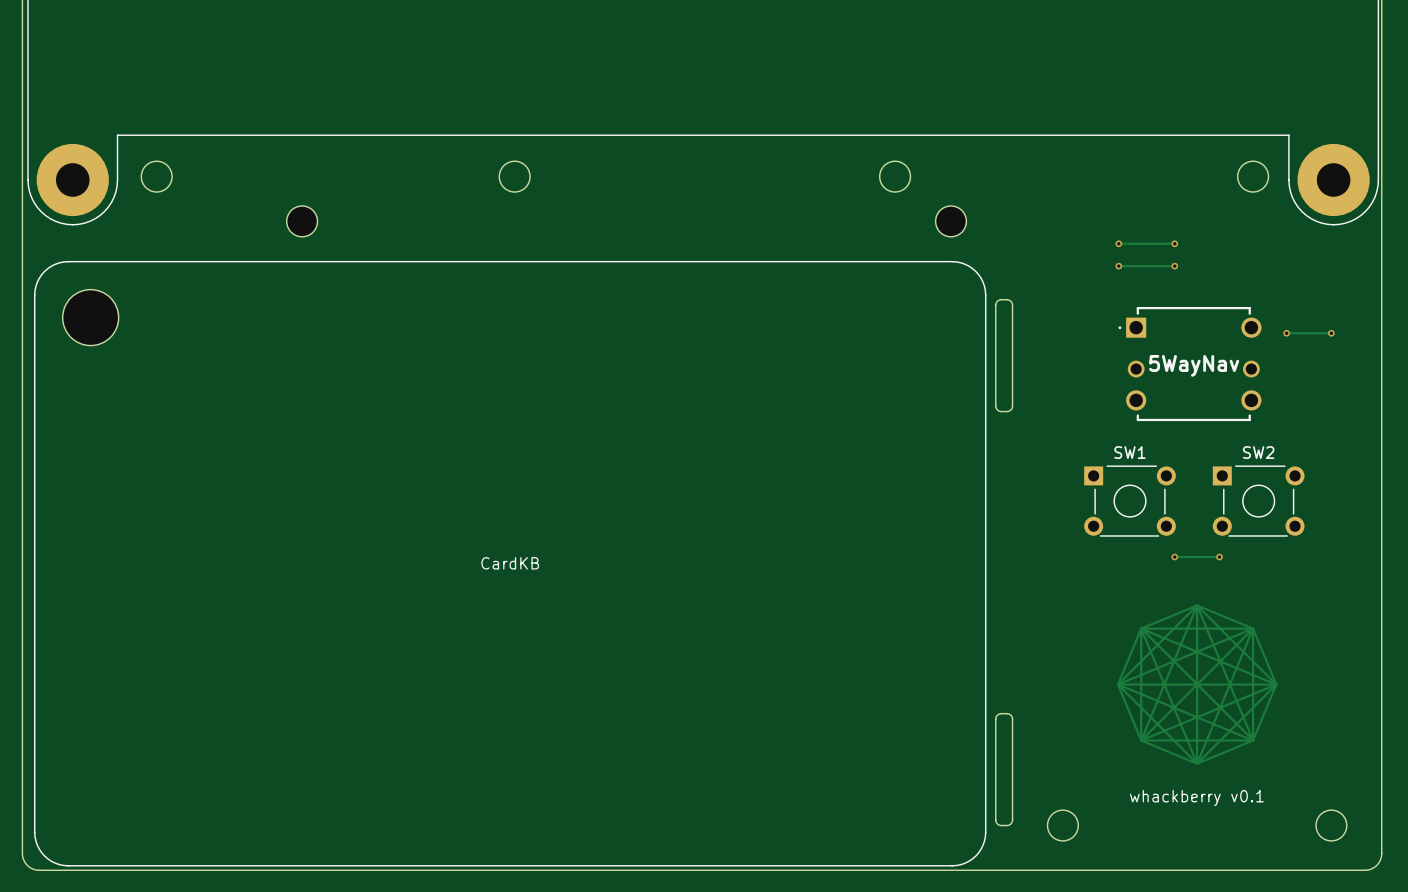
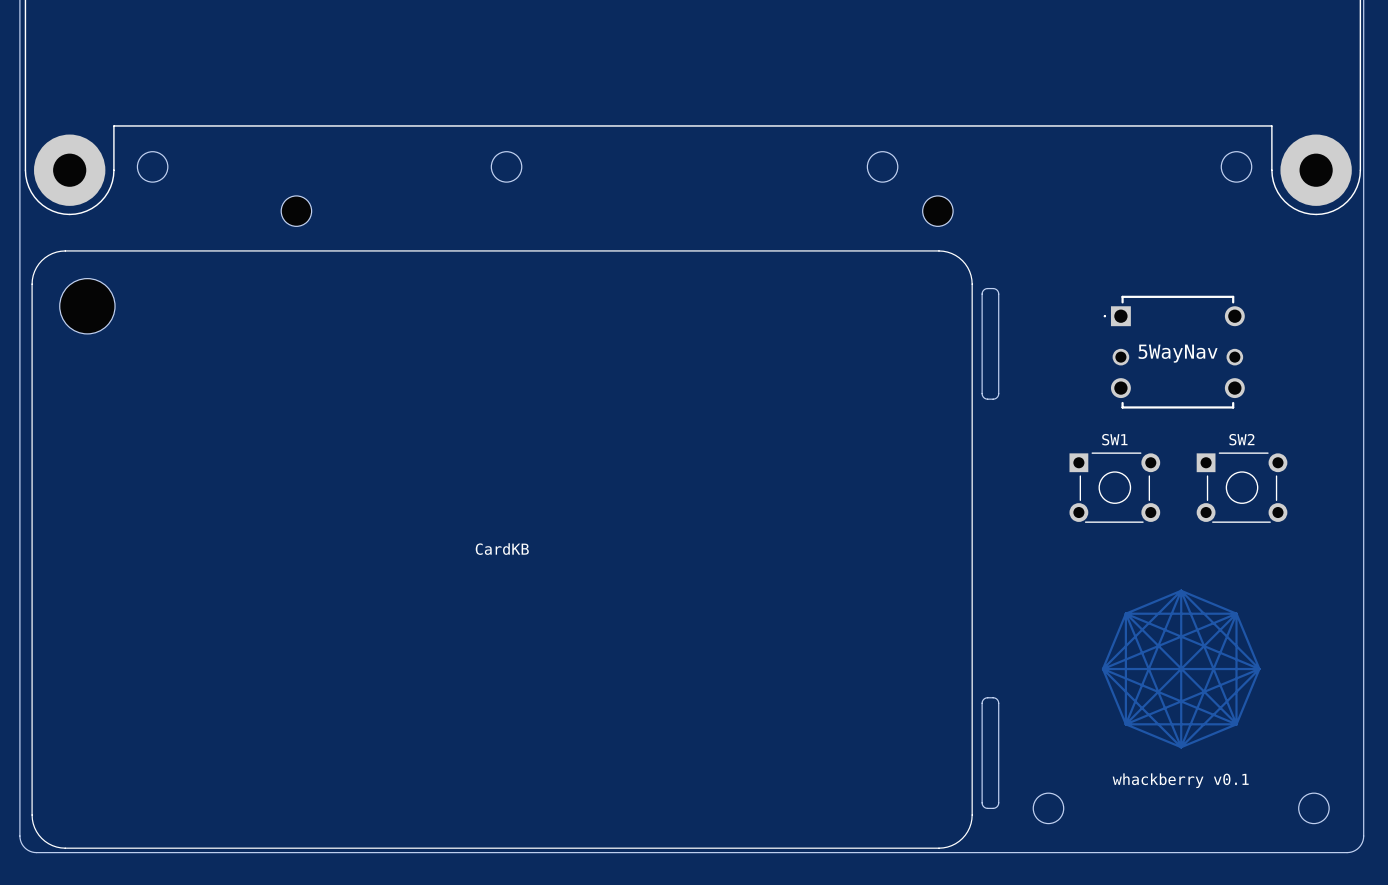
track: (1118, 243) (1174, 243) -> none
via: (1118, 243) -> none
via: (1174, 243) -> none
track: (1118, 266) (1174, 266) -> none
via: (1118, 266) -> none
via: (1174, 266) -> none
track: (1286, 333) (1331, 333) -> none
via: (1286, 333) -> none
via: (1331, 333) -> none
track: (1174, 557) (1219, 557) -> none
via: (1174, 557) -> none
via: (1219, 557) -> none

